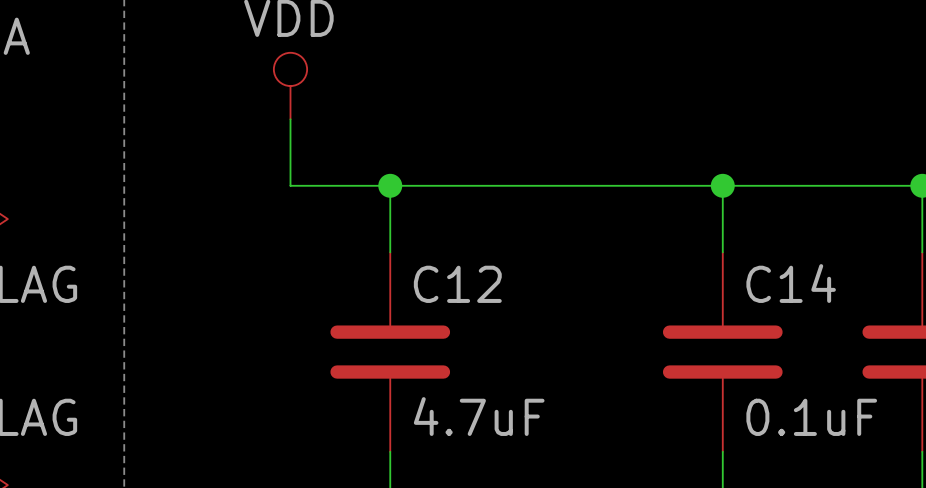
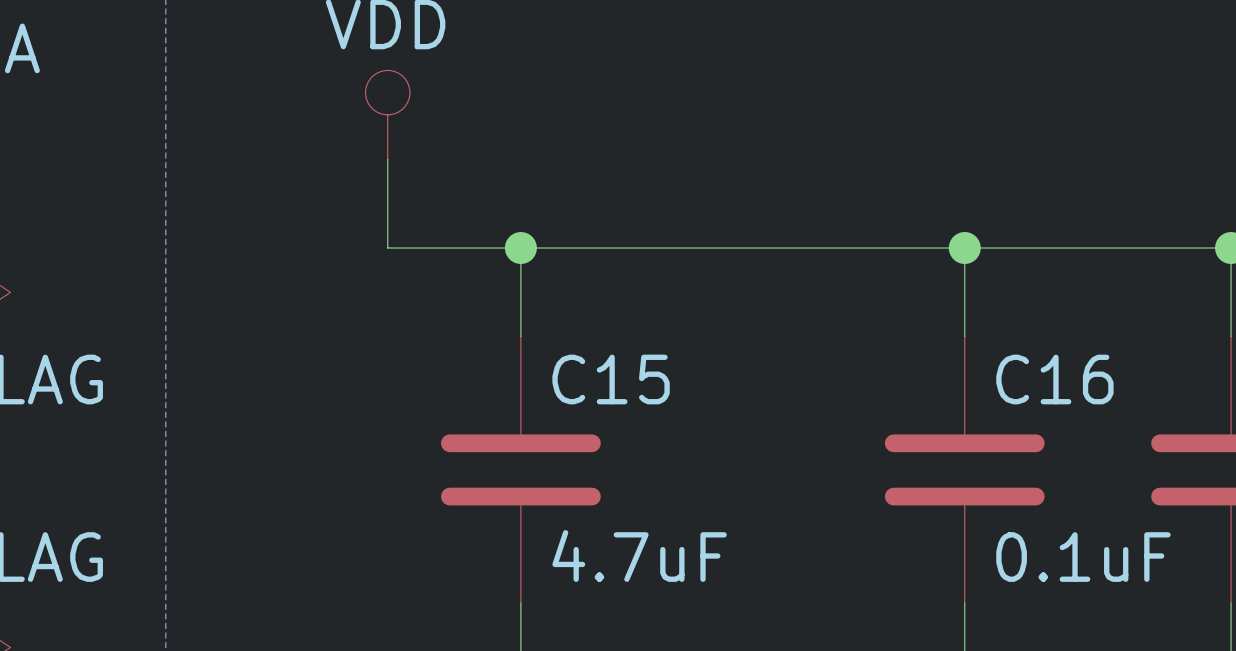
C14 name: C14 (791, 283) -> C16 (1054, 379)
C12 name: C12 (457, 284) -> C15 (611, 379)

